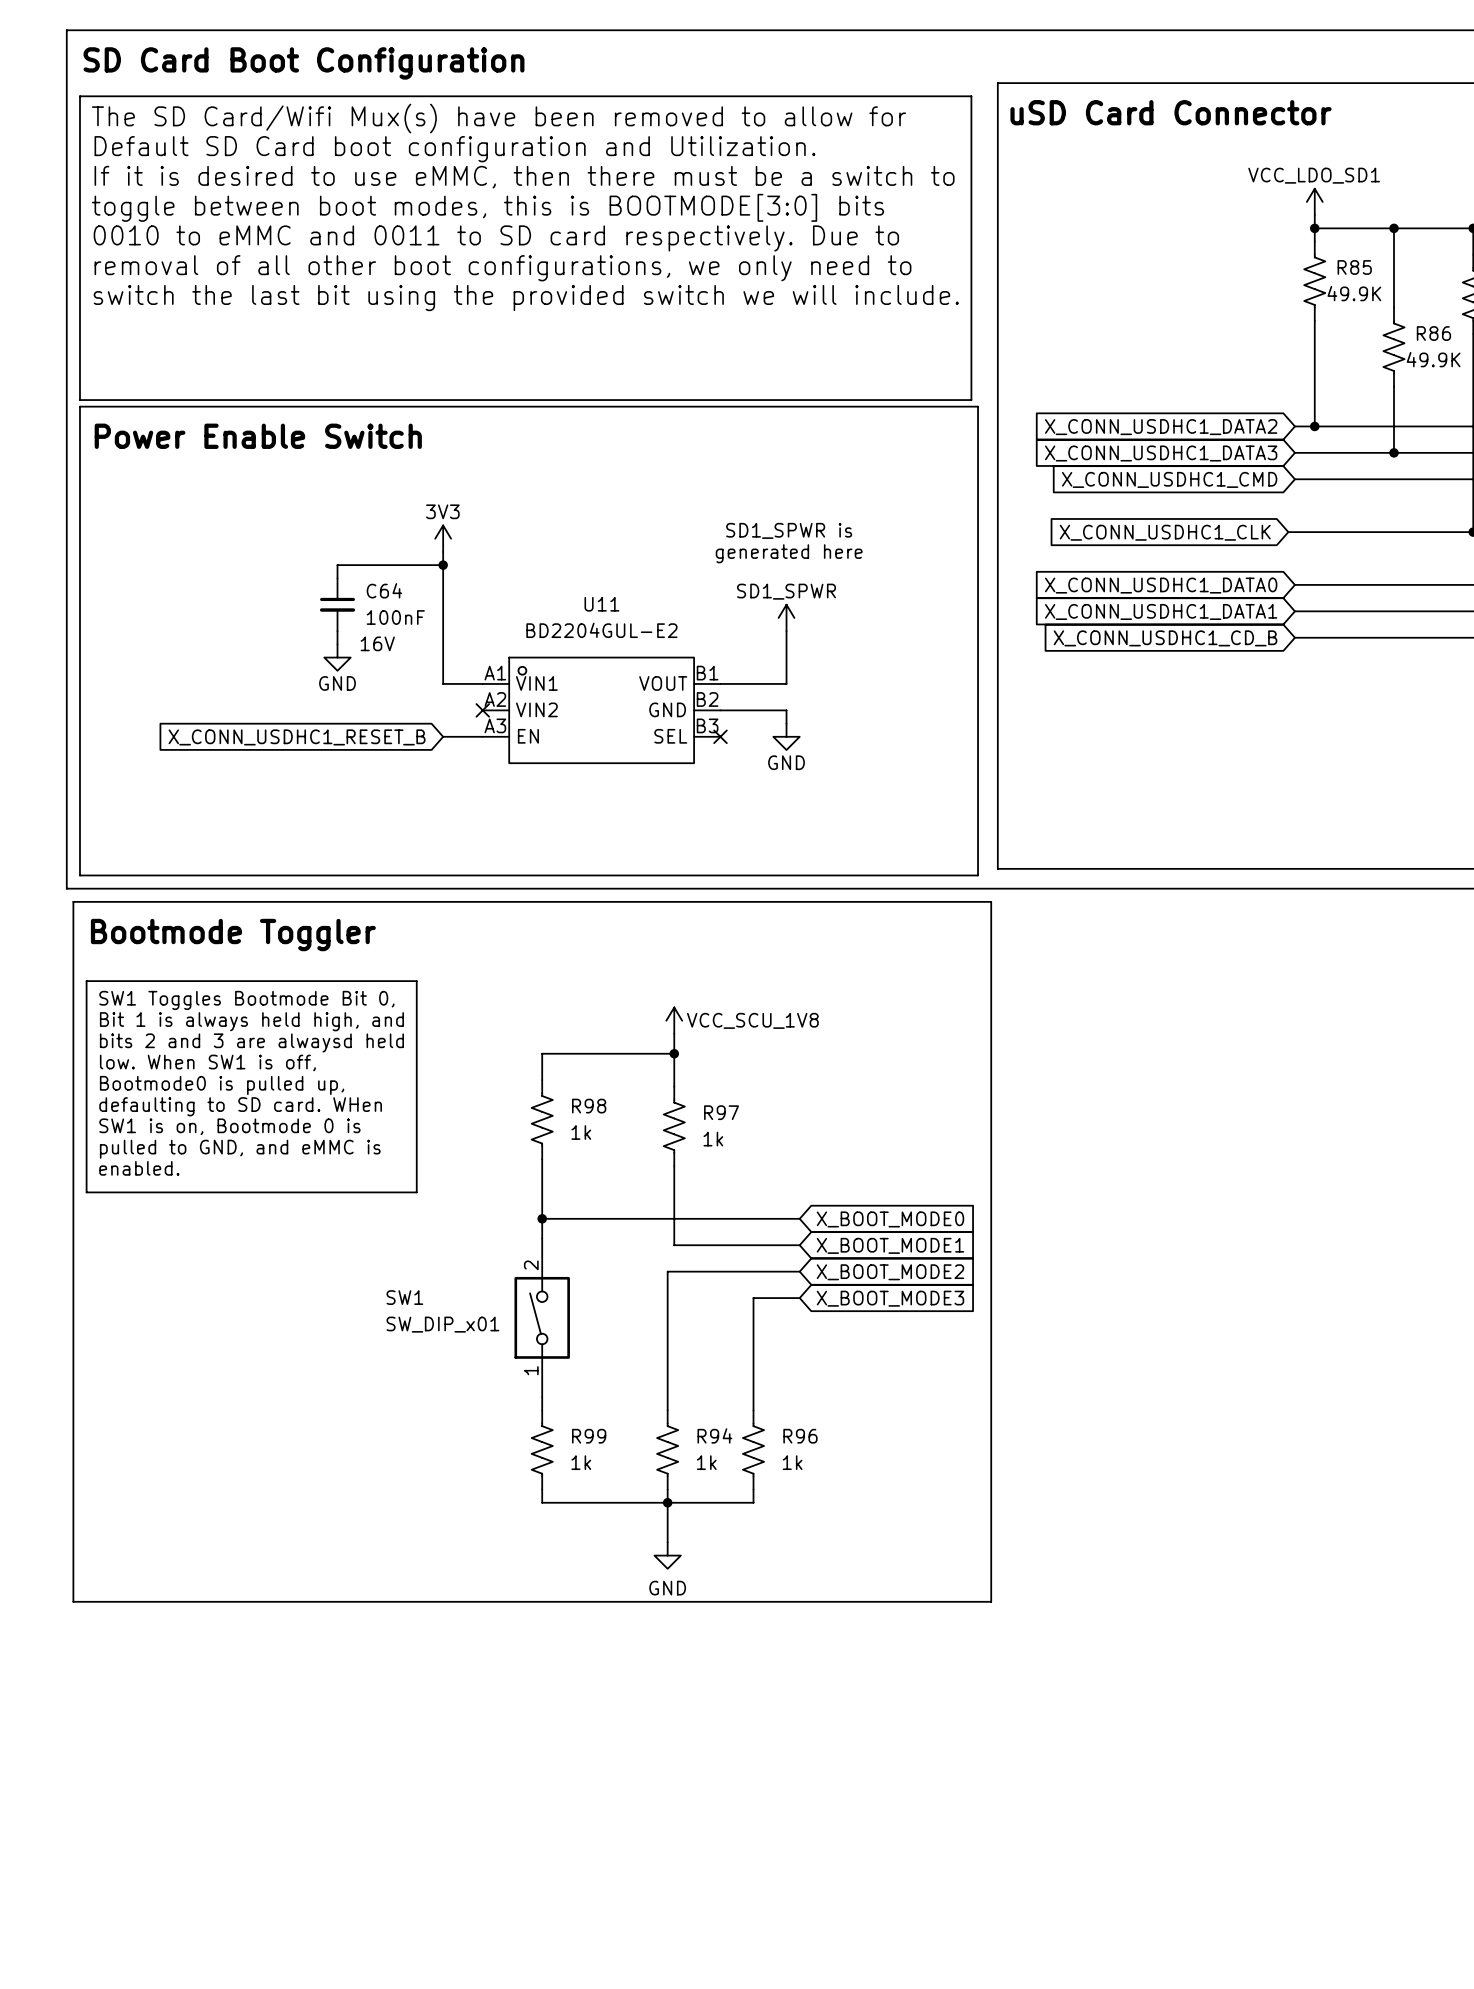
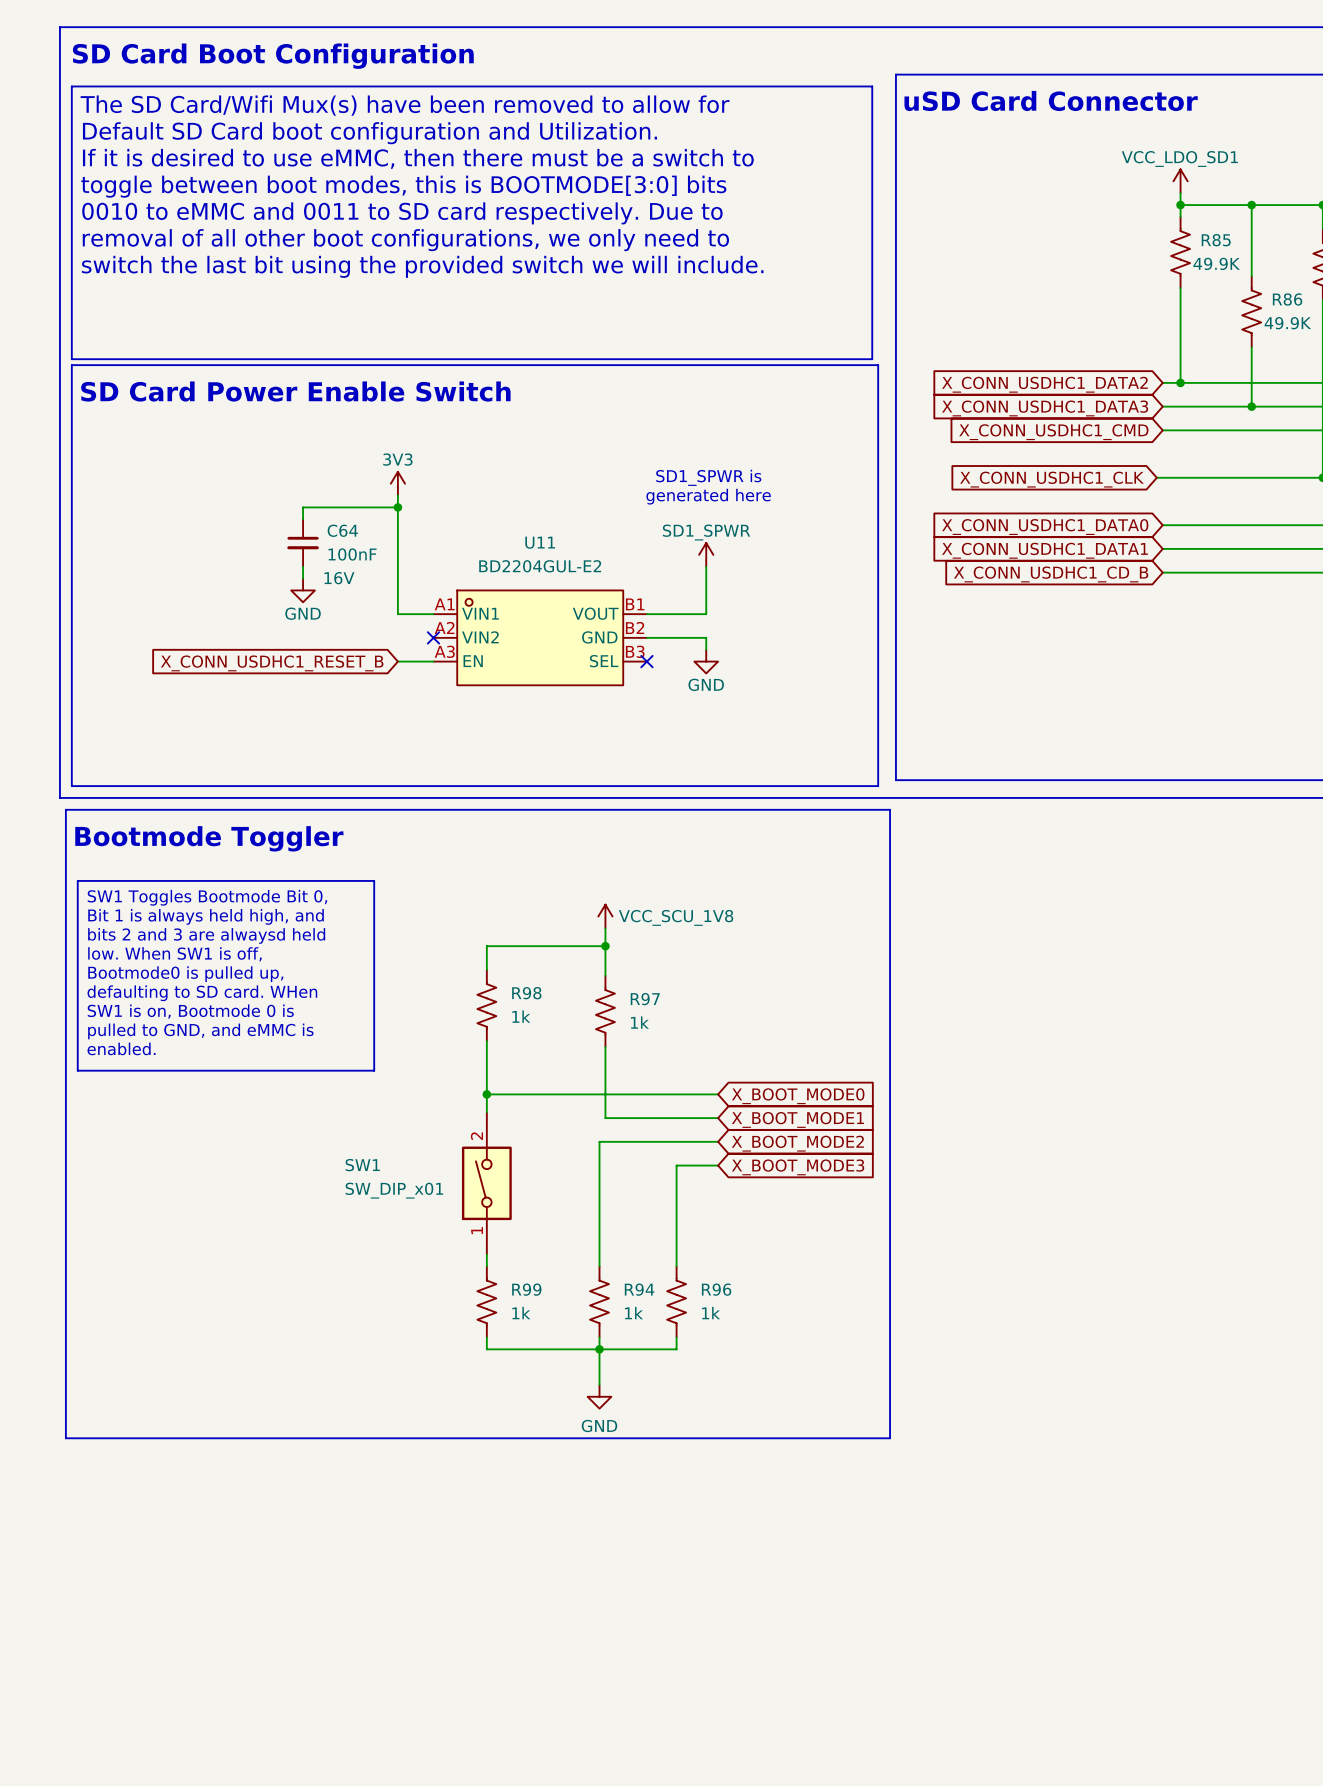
text: Power Enable Switch (258, 436) -> SD Card Power Enable Switch (295, 391)

